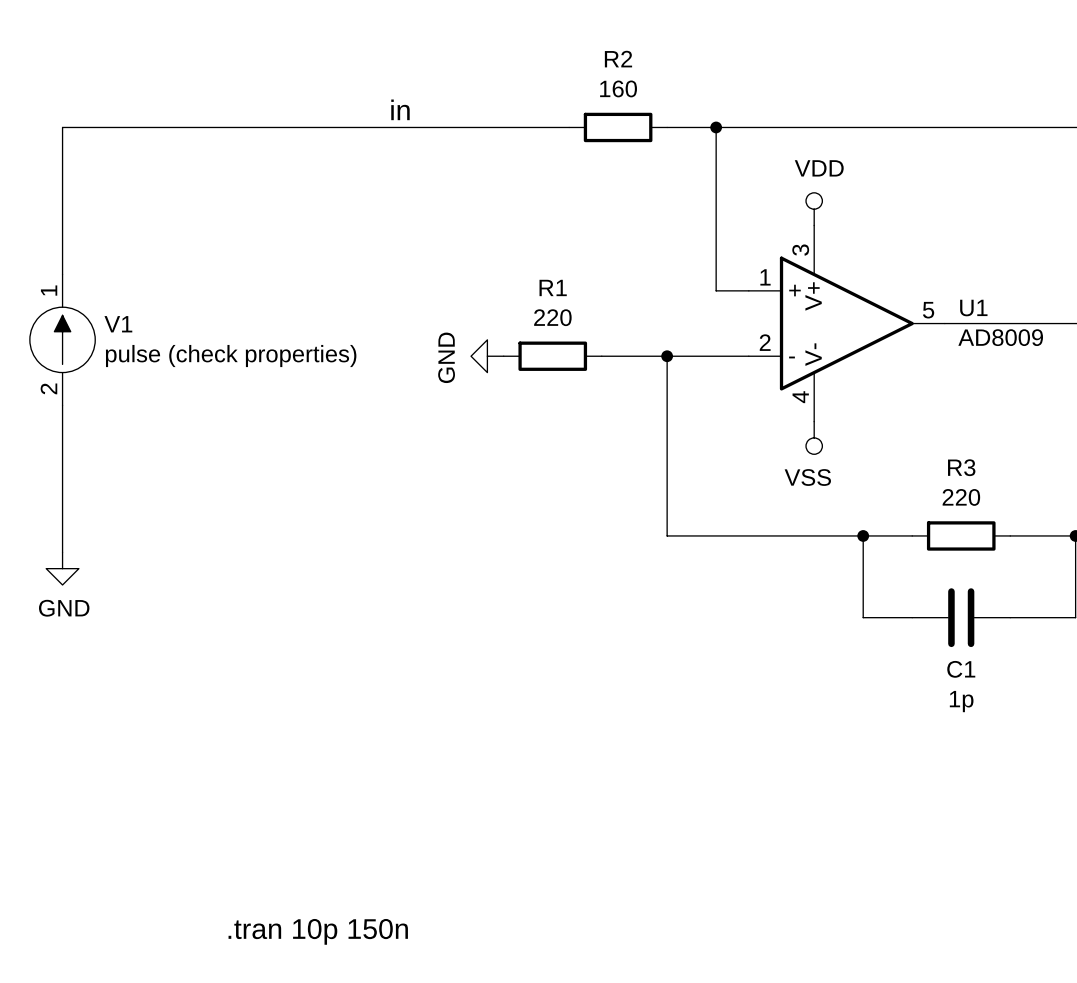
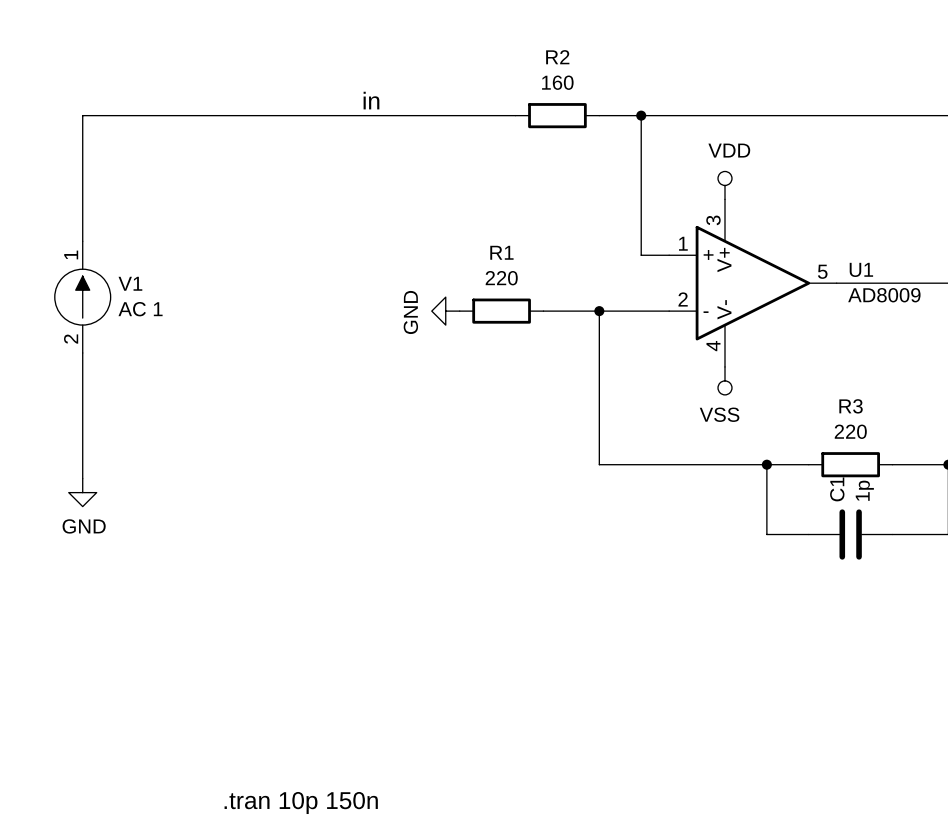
V1 value: pulse (check properties) (231, 356) -> AC 1 (140, 309)
C1 name rotation: 0° (961, 669) -> 90° counterclockwise (837, 489)
C1 name position: C1 (961, 669) -> C1 (837, 489)
C1 value rotation: 0° (961, 701) -> 90° counterclockwise (864, 490)
C1 value position: 1p (961, 701) -> 1p (864, 490)

